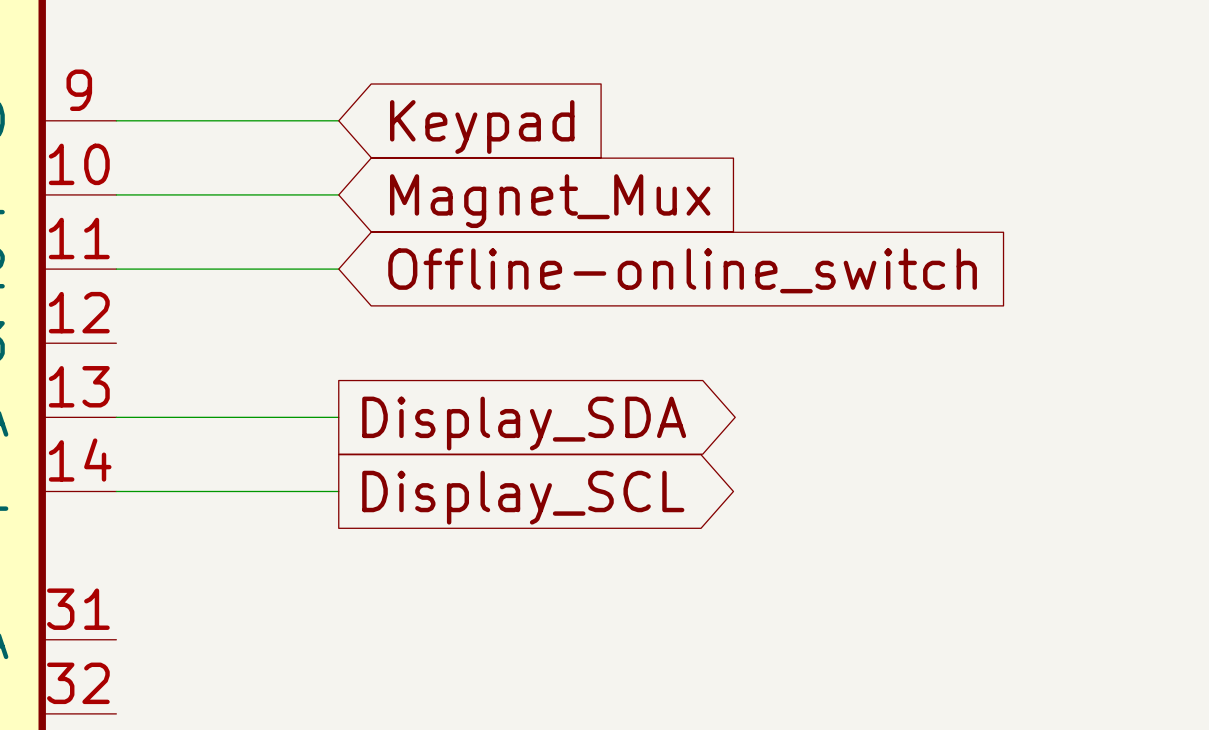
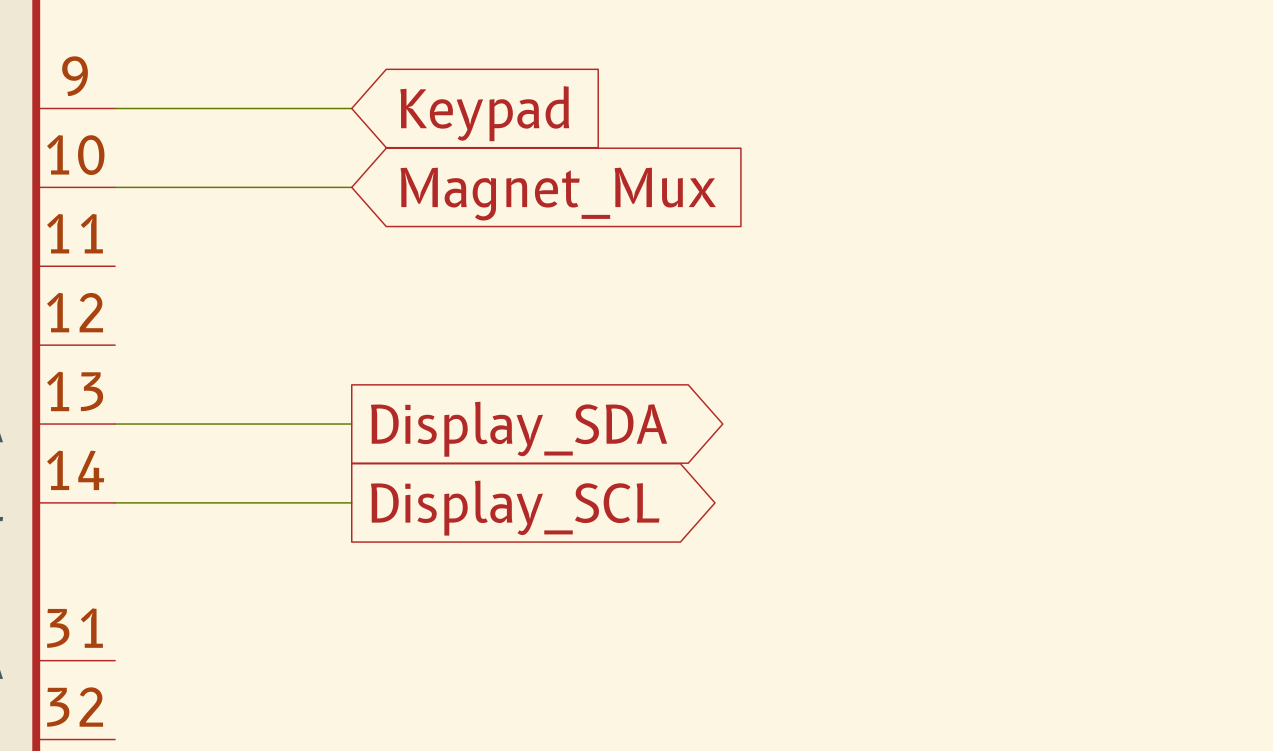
wire: (116, 269) (338, 269) -> none
global label: Offline-online_switch (682, 270) -> none

